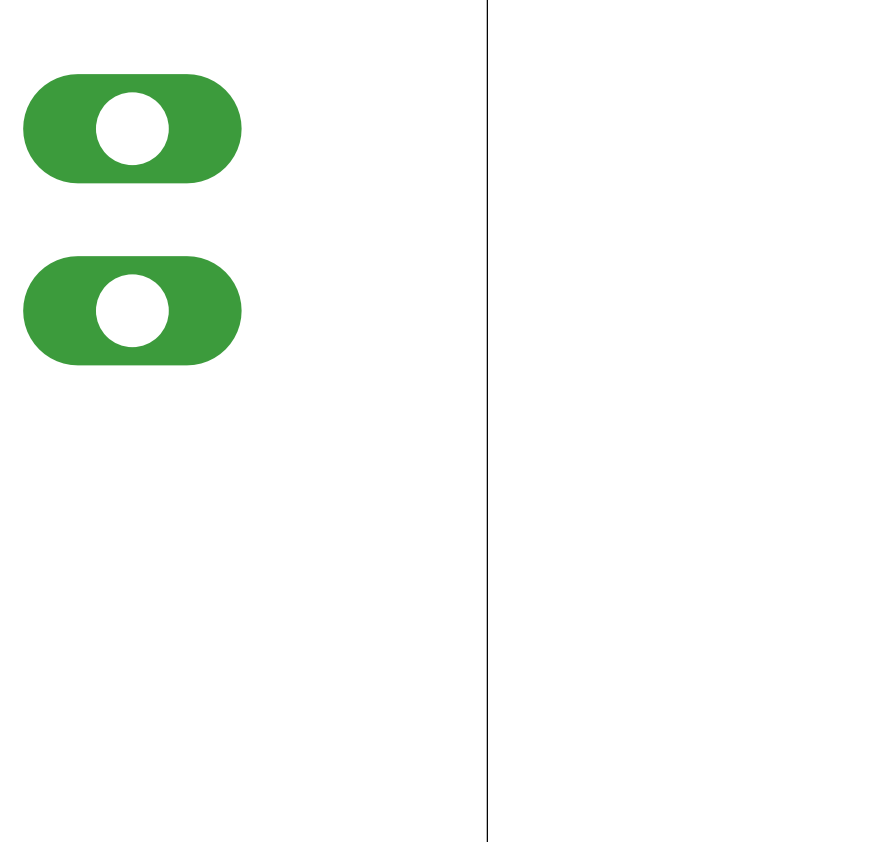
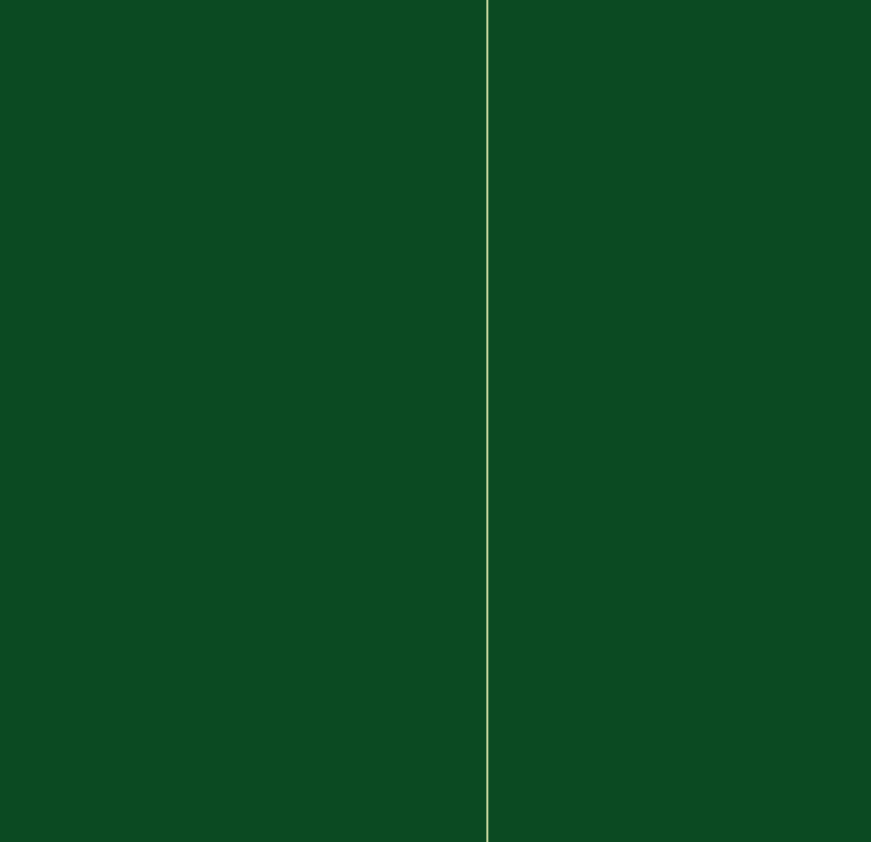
part: (132, 219) -> none

